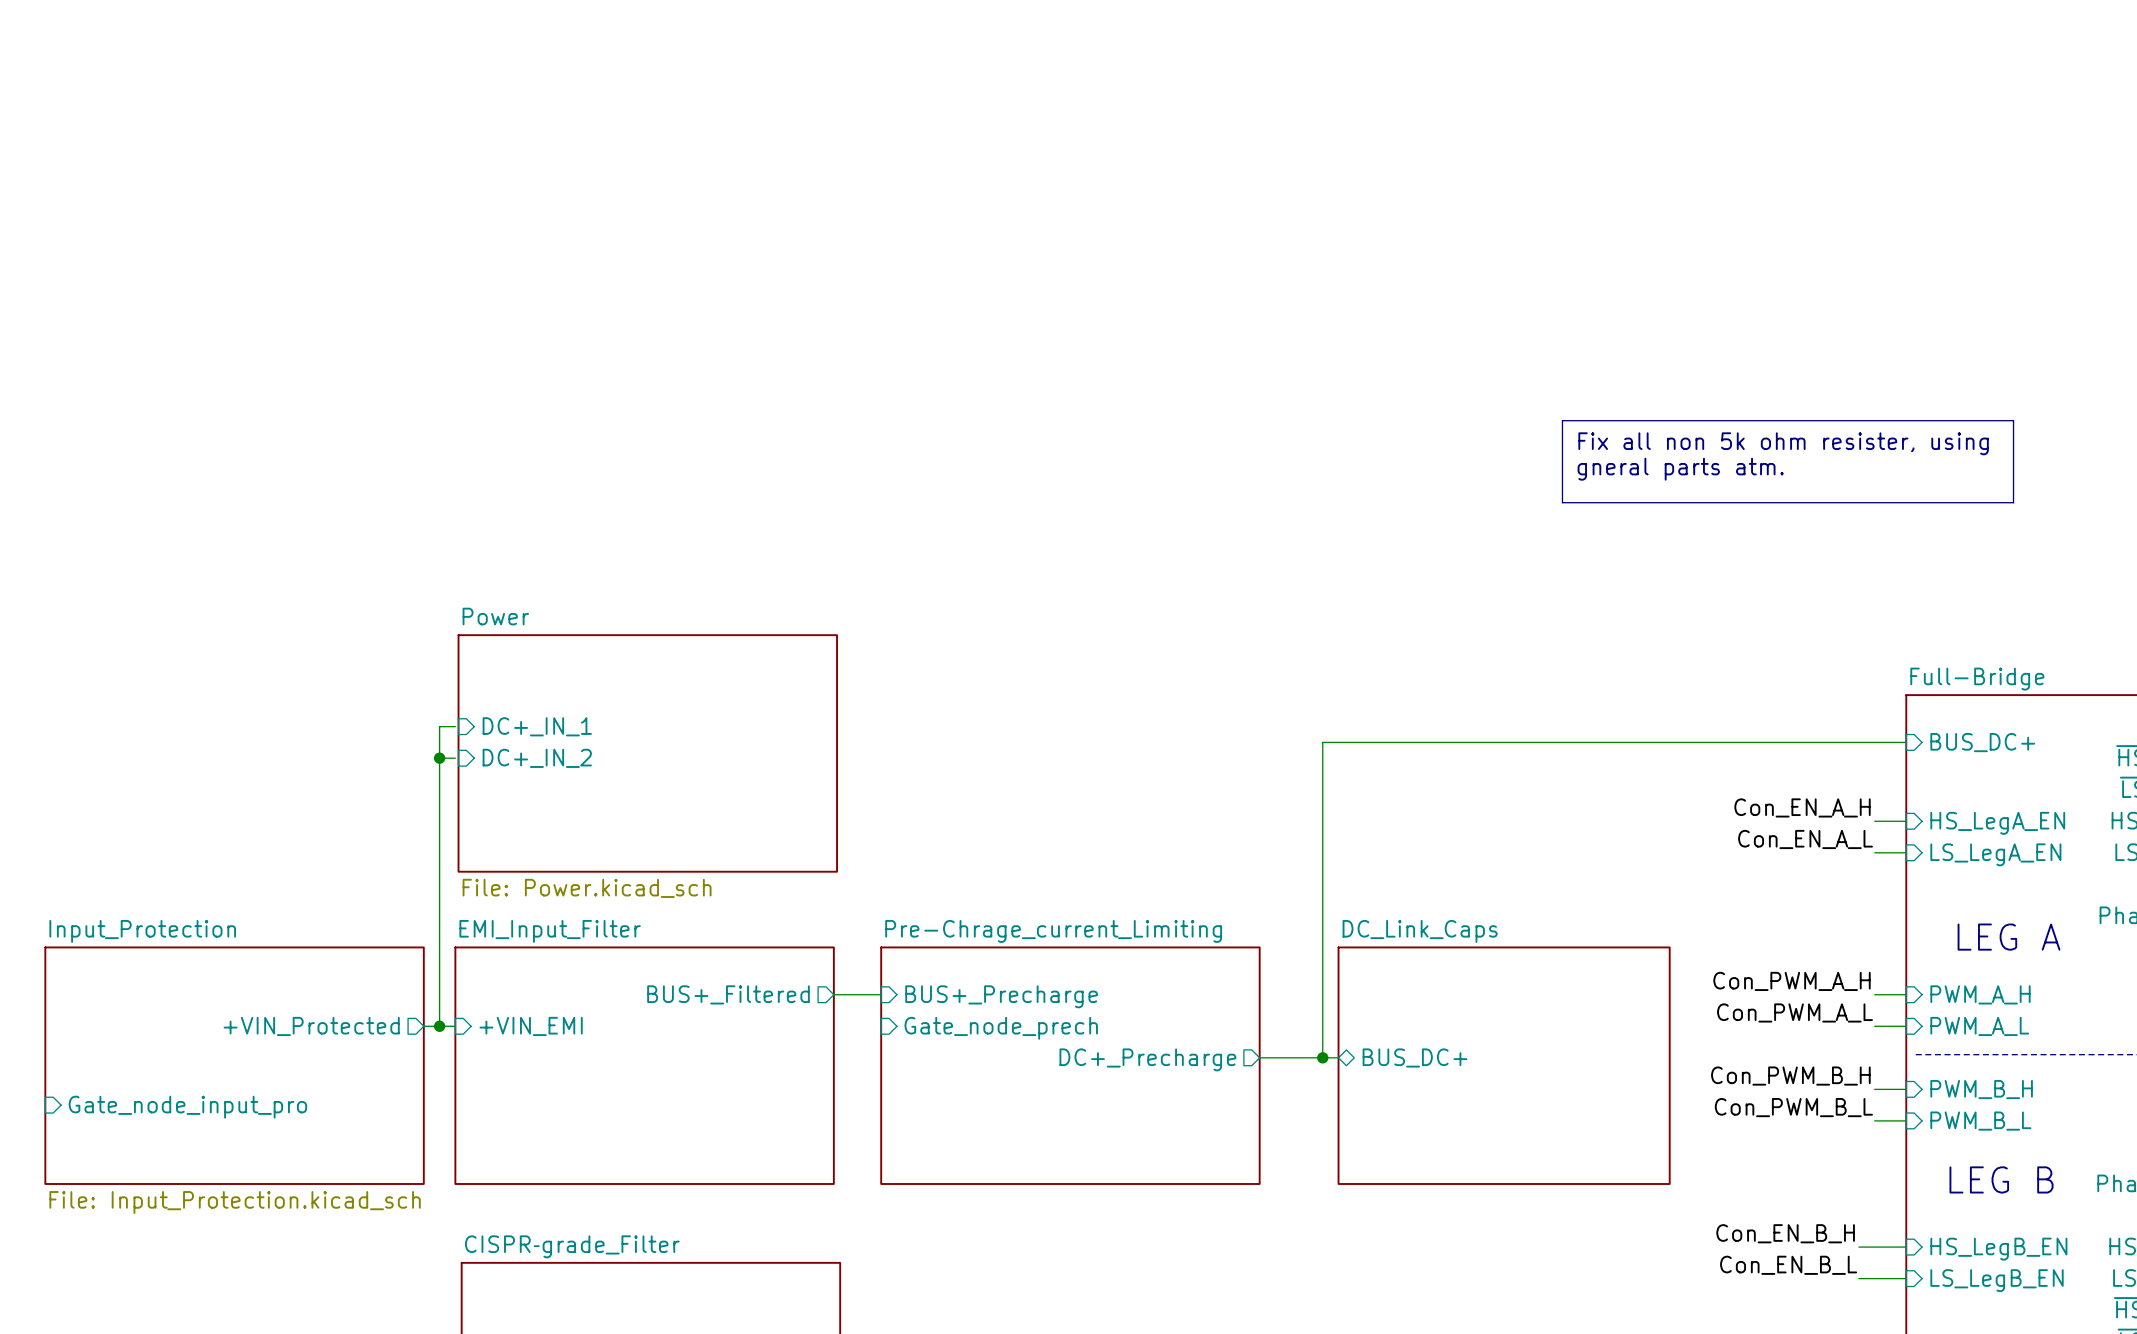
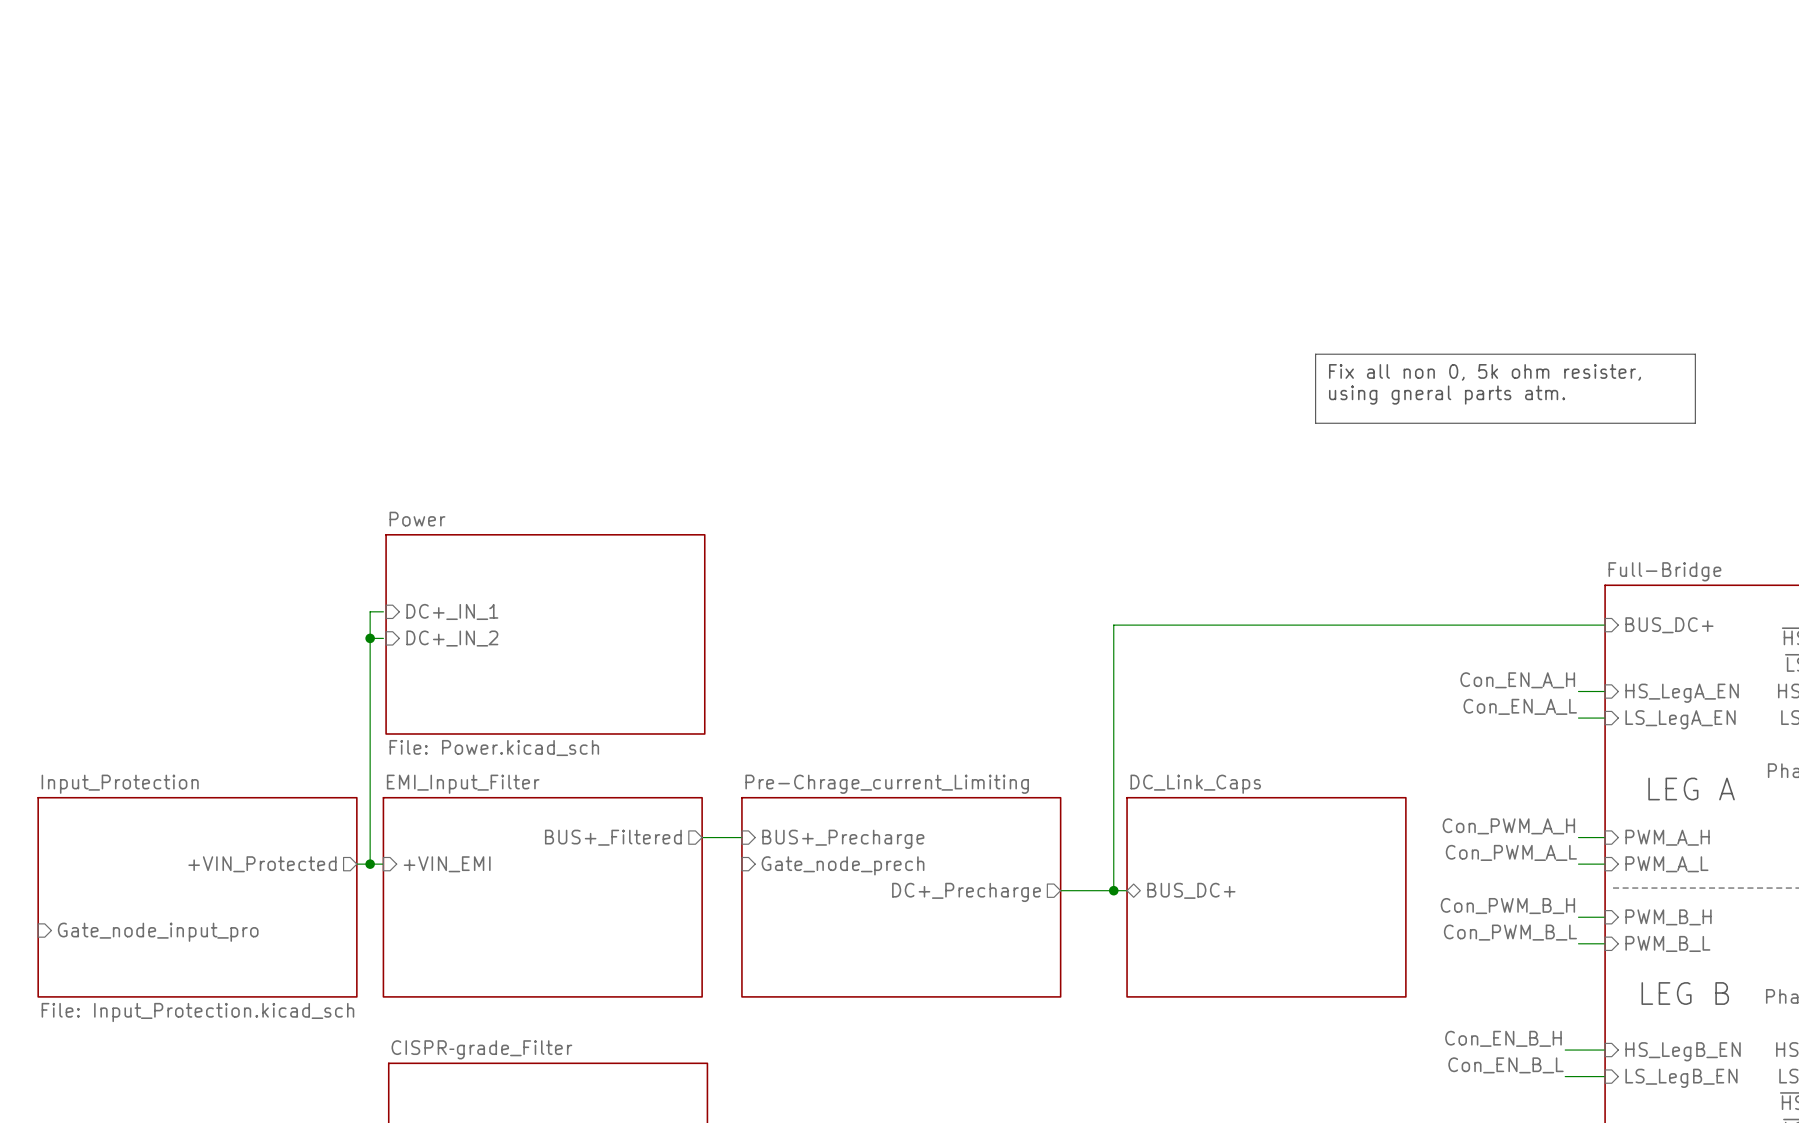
text: Fix all non 5k ohm resister, using (1783, 443) -> Fix all non 0, 5k ohm resister, (1485, 372)
text: gneral parts atm. (1680, 469) -> using gneral parts atm. (1447, 395)

